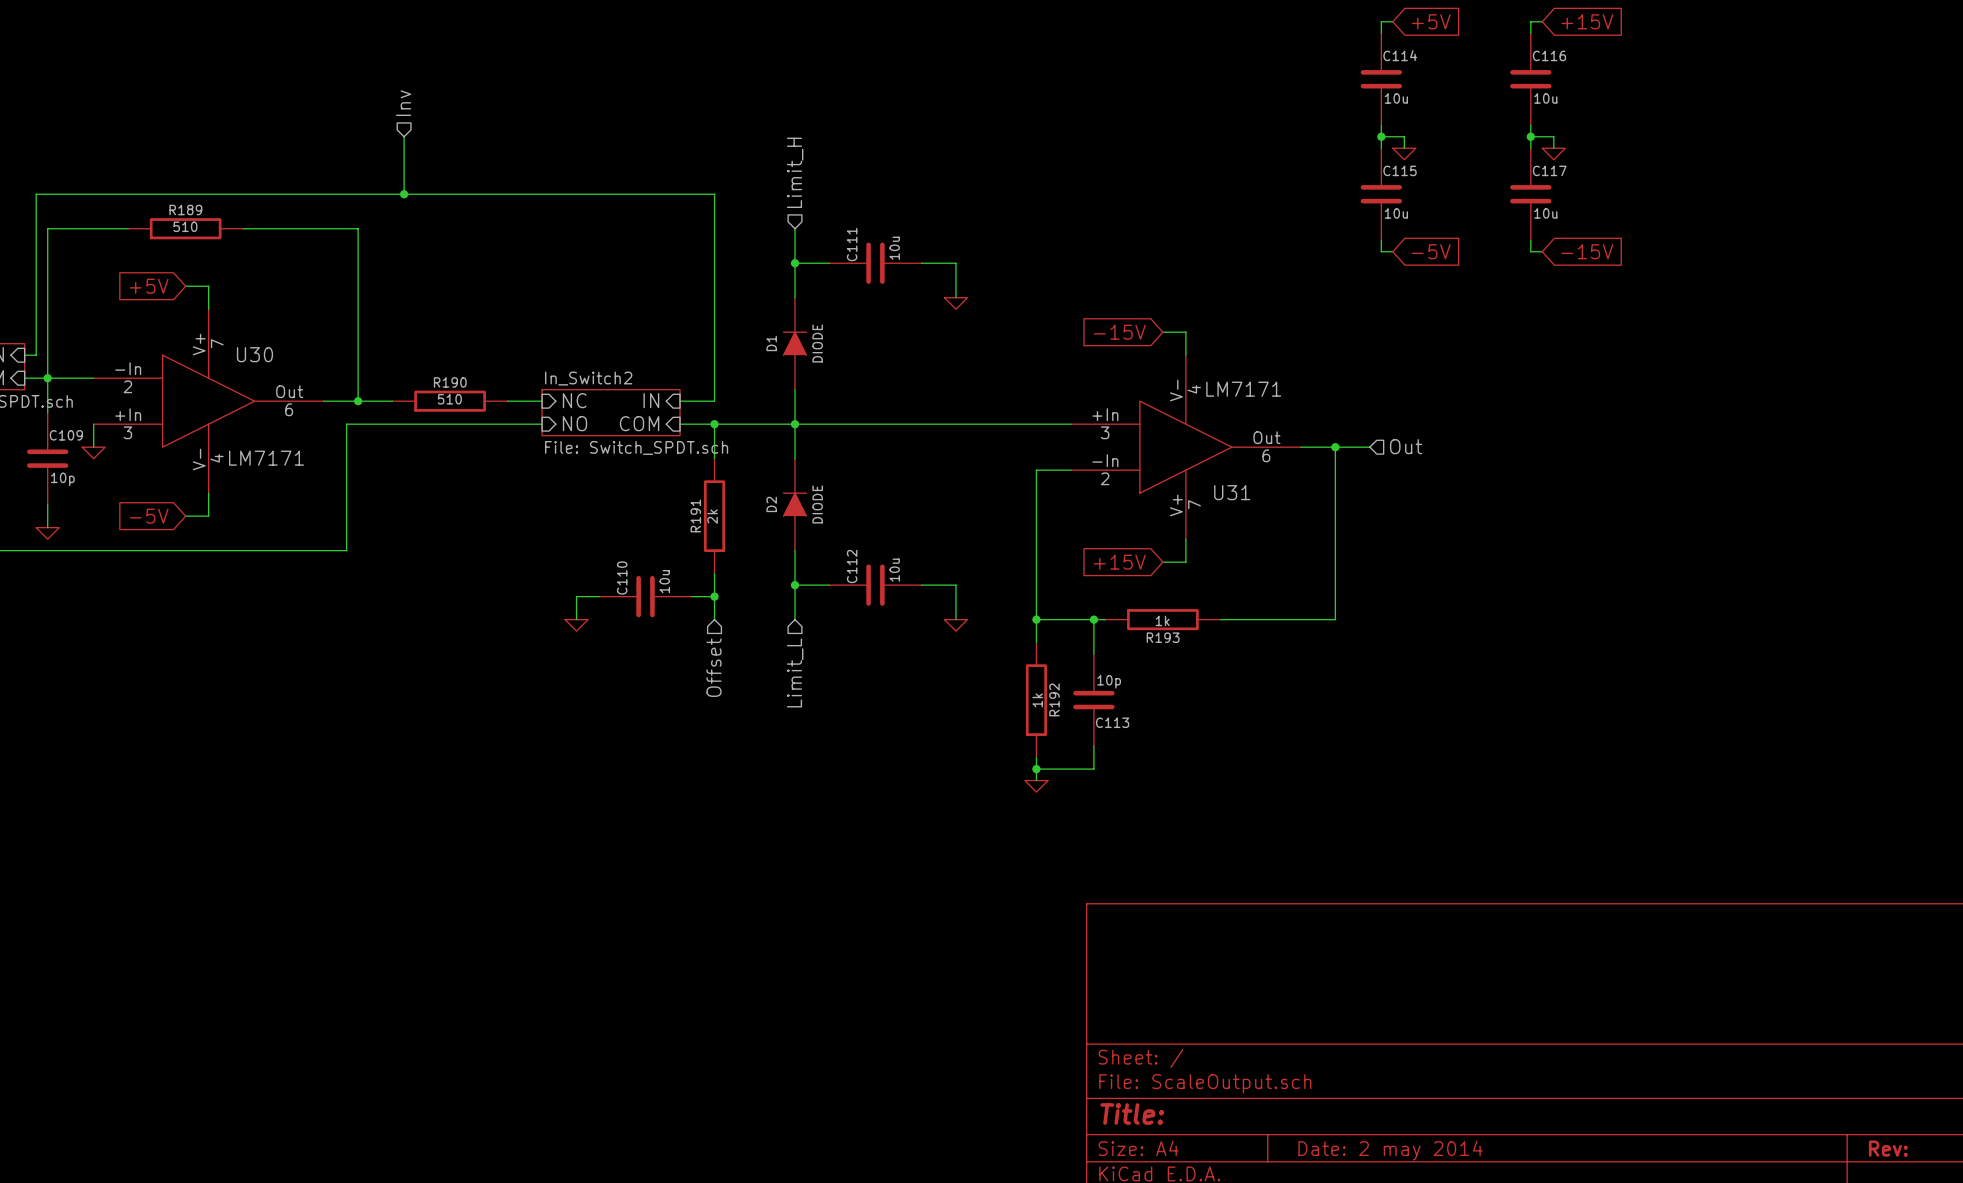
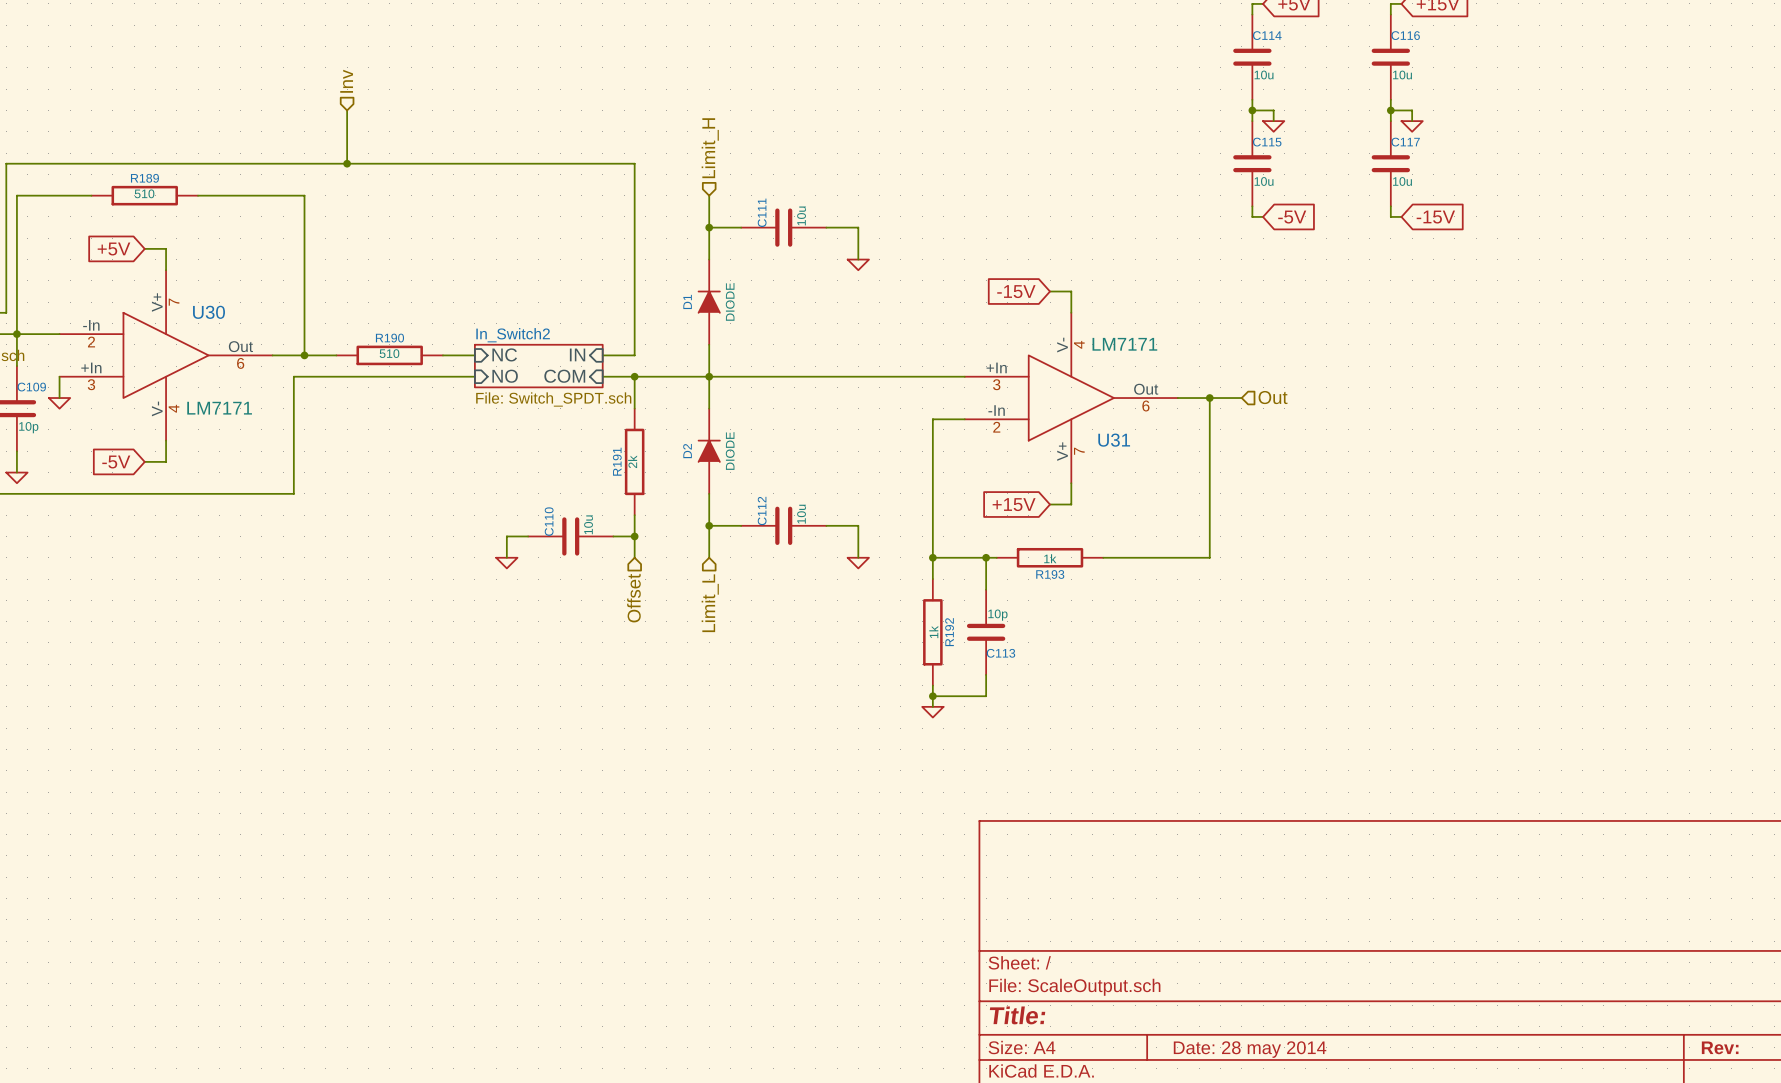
title block: Date: 2 may 2014 (1390, 1150) -> Date: 28 may 2014 (1250, 1049)

